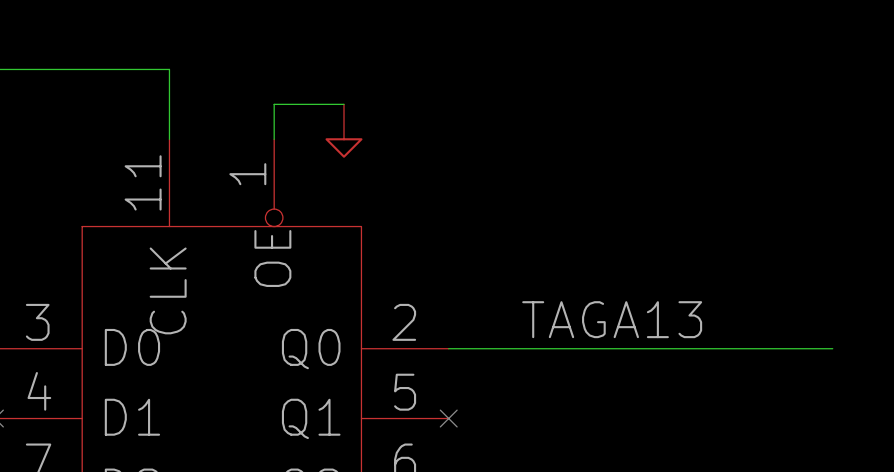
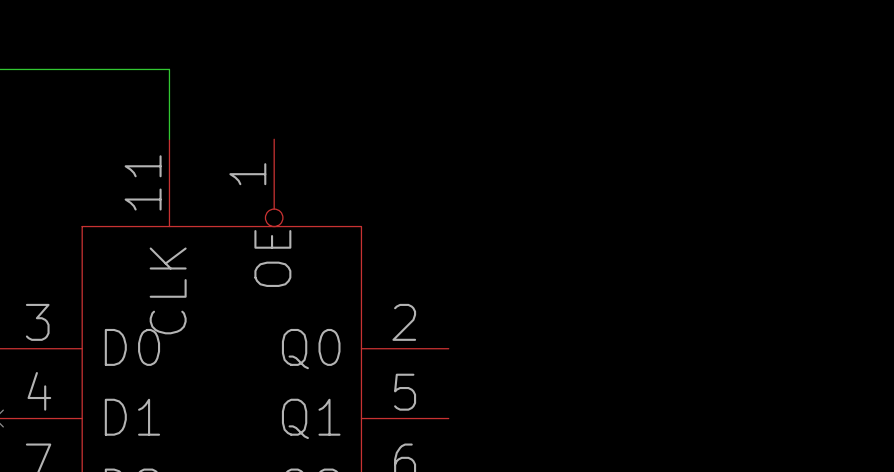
wire: (344, 104) (274, 104) (274, 139) -> none
power symbol: (344, 131) -> none
label: TAGA13 (612, 319) -> none
wire: (448, 348) (832, 348) -> none
no-connect mark: (448, 418) -> none

